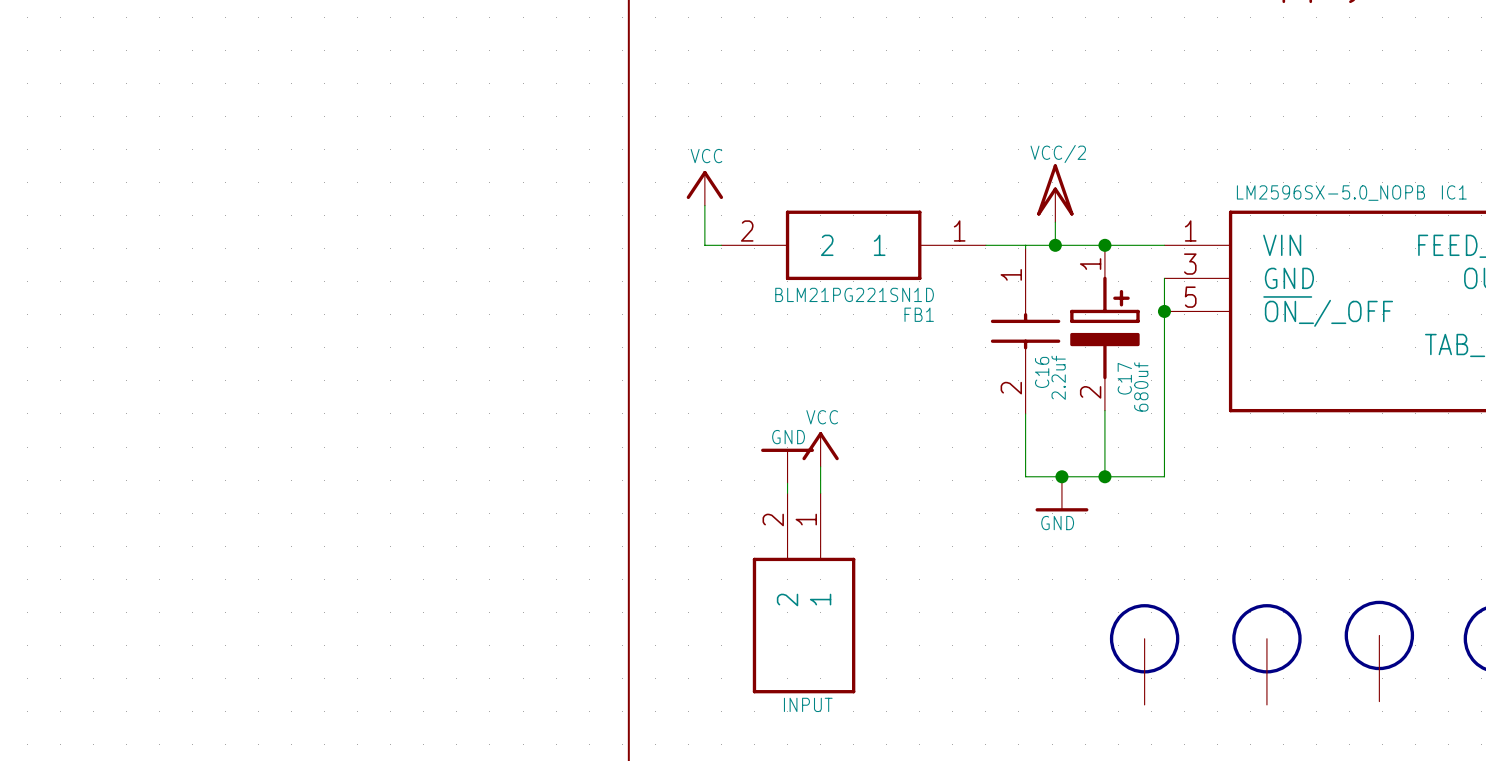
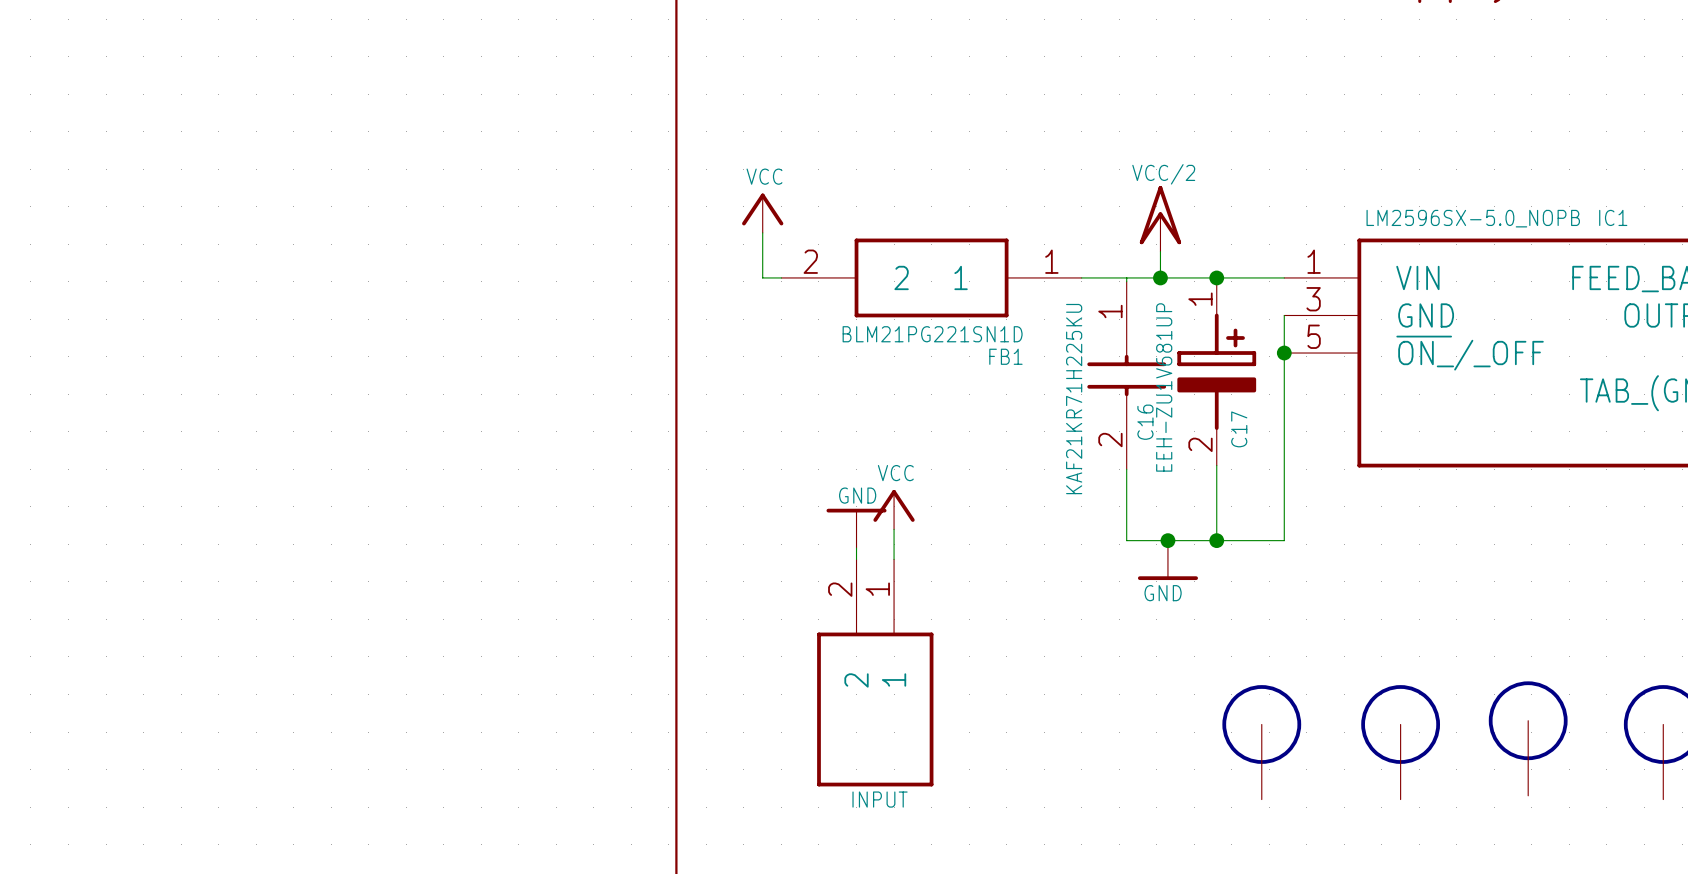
C16 value: 2.2uf (1058, 377) -> KAF21KR71H225KU (1074, 399)
C17 value: 680uf (1141, 386) -> EEH-ZU1V681UP (1164, 387)

